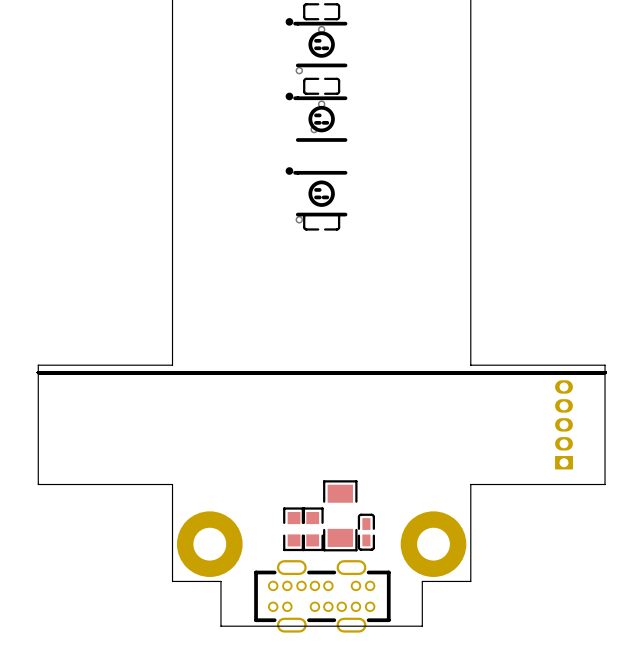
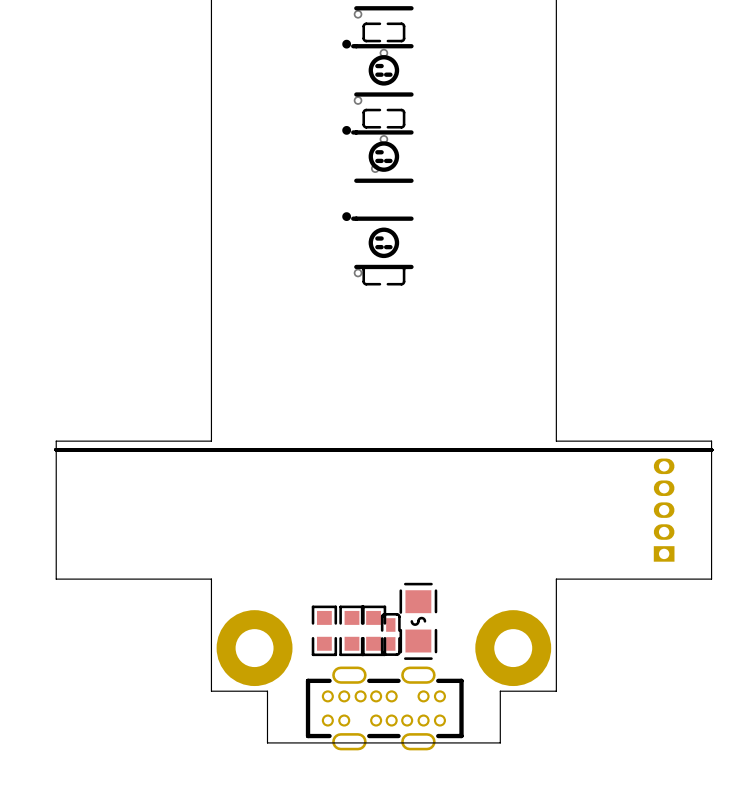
part: (340, 515) -> none
part: none -> (418, 621)
part: none -> (324, 630)
part position: (366, 532) -> (390, 634)

